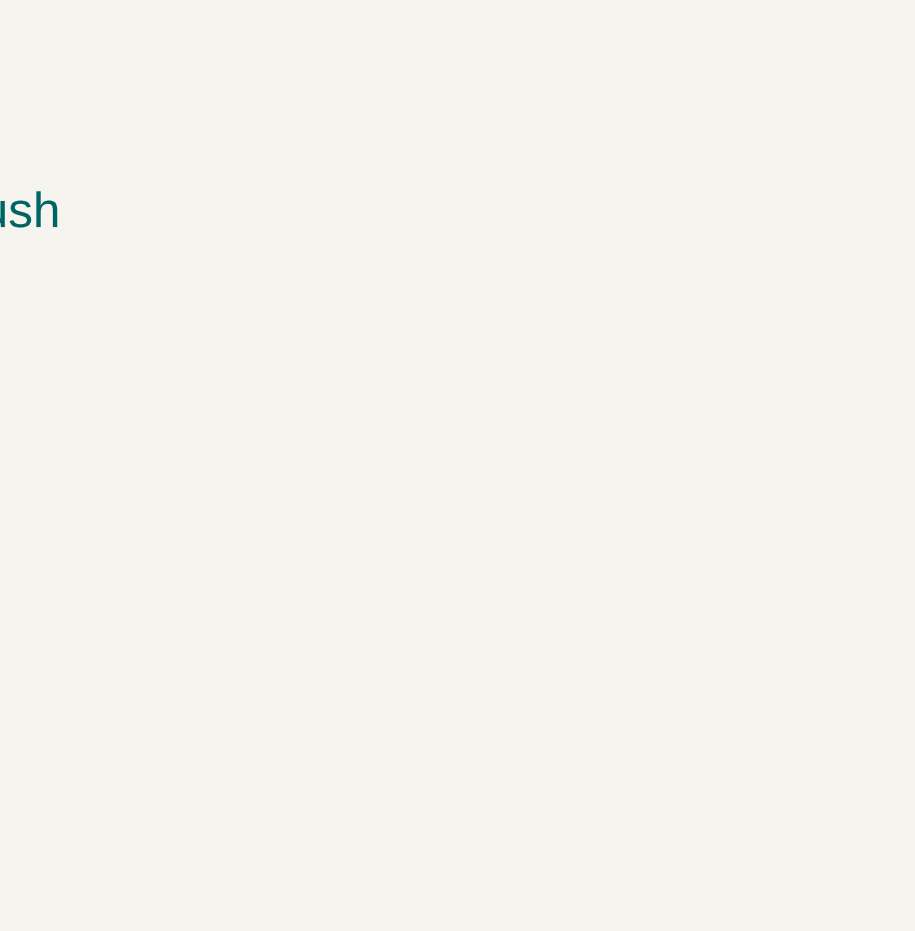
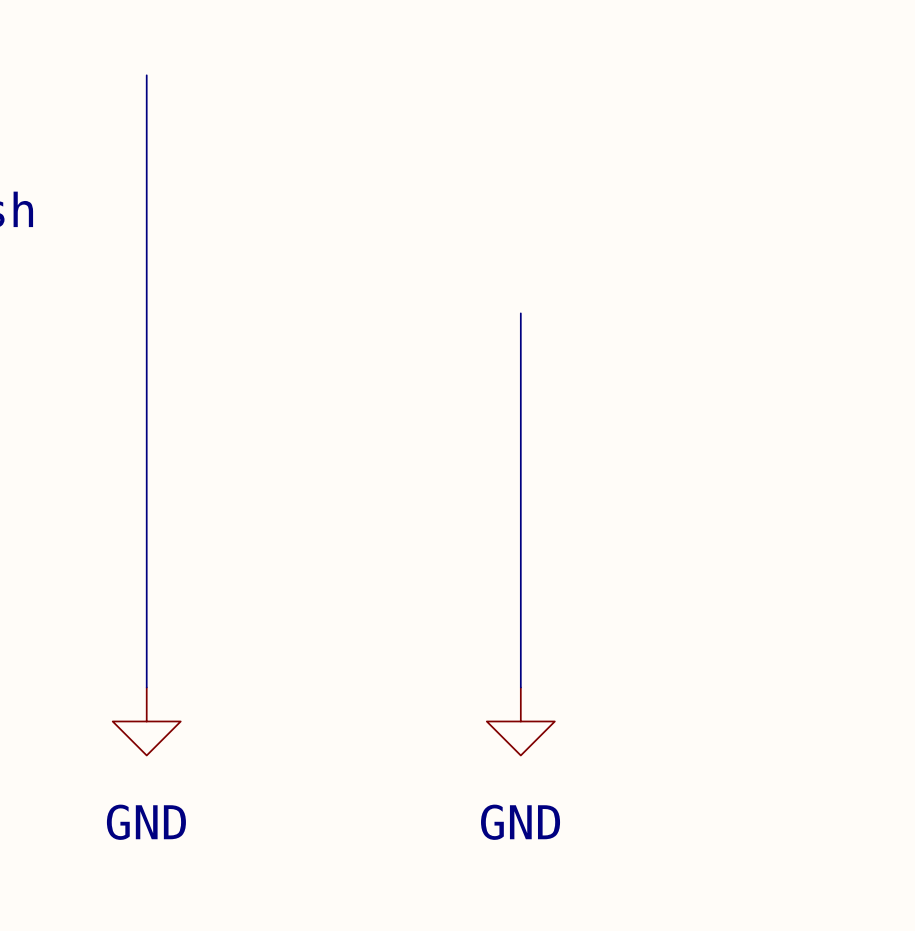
wire: none -> (146, 75) (146, 687)
wire: none -> (520, 313) (520, 687)
power symbol: none -> GND (146, 721)
power symbol: none -> GND (520, 721)

